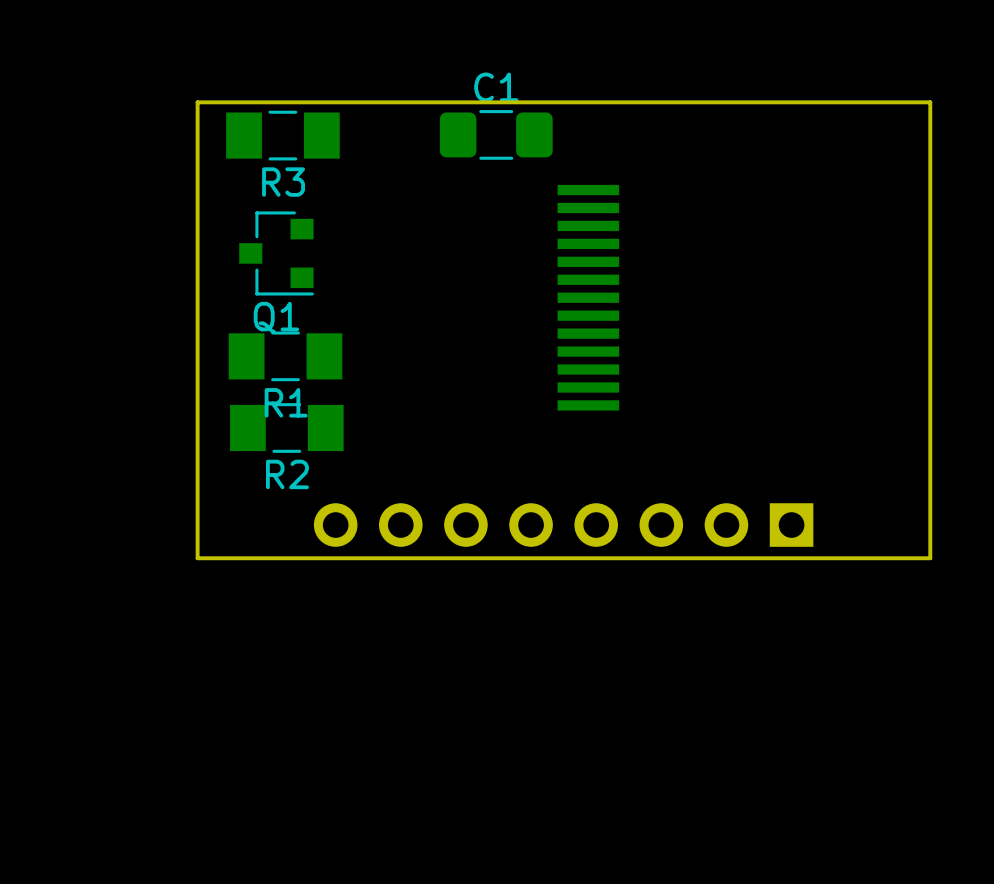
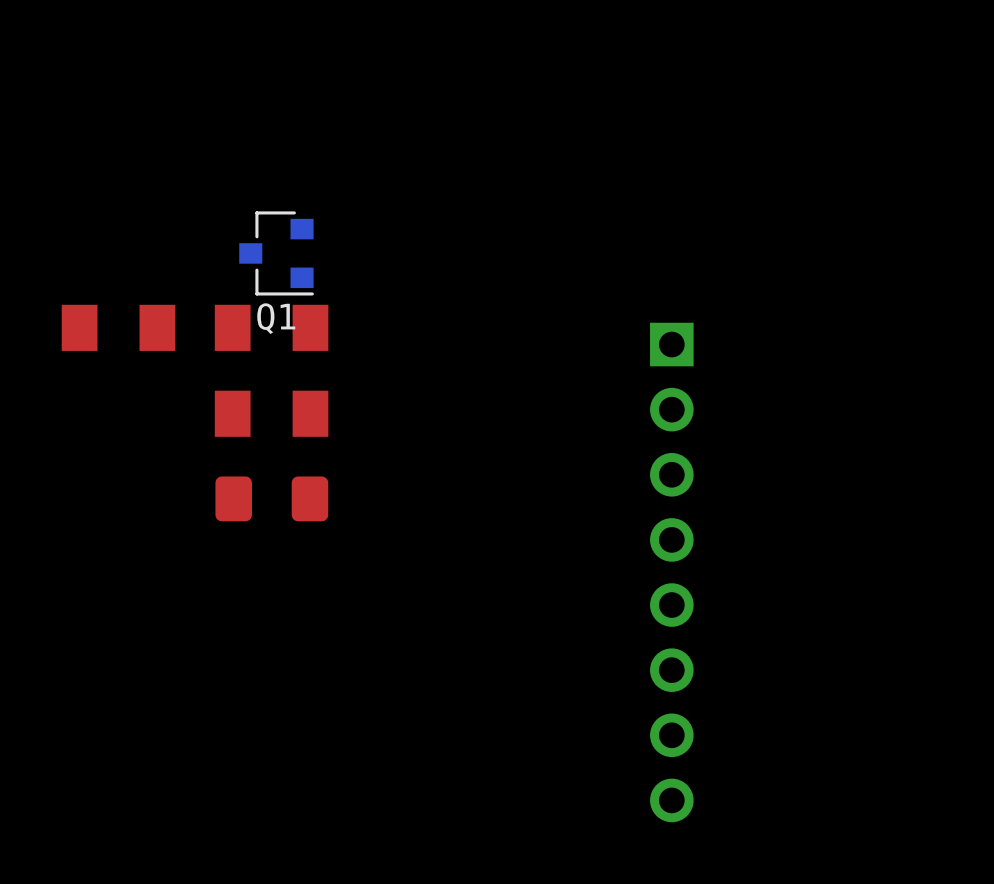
board edge: (930, 102) (197, 102) (197, 558) (930, 558) (930, 102) -> none
C1 side: bottom (496, 134) -> top (271, 498)
R3 side: bottom (282, 135) -> top (271, 413)
part: (588, 297) -> none
R1 side: bottom (285, 356) -> top (271, 327)
R2 side: bottom (286, 427) -> top (118, 327)
part rotation: 0° (563, 525) -> 90° counterclockwise (671, 572)

